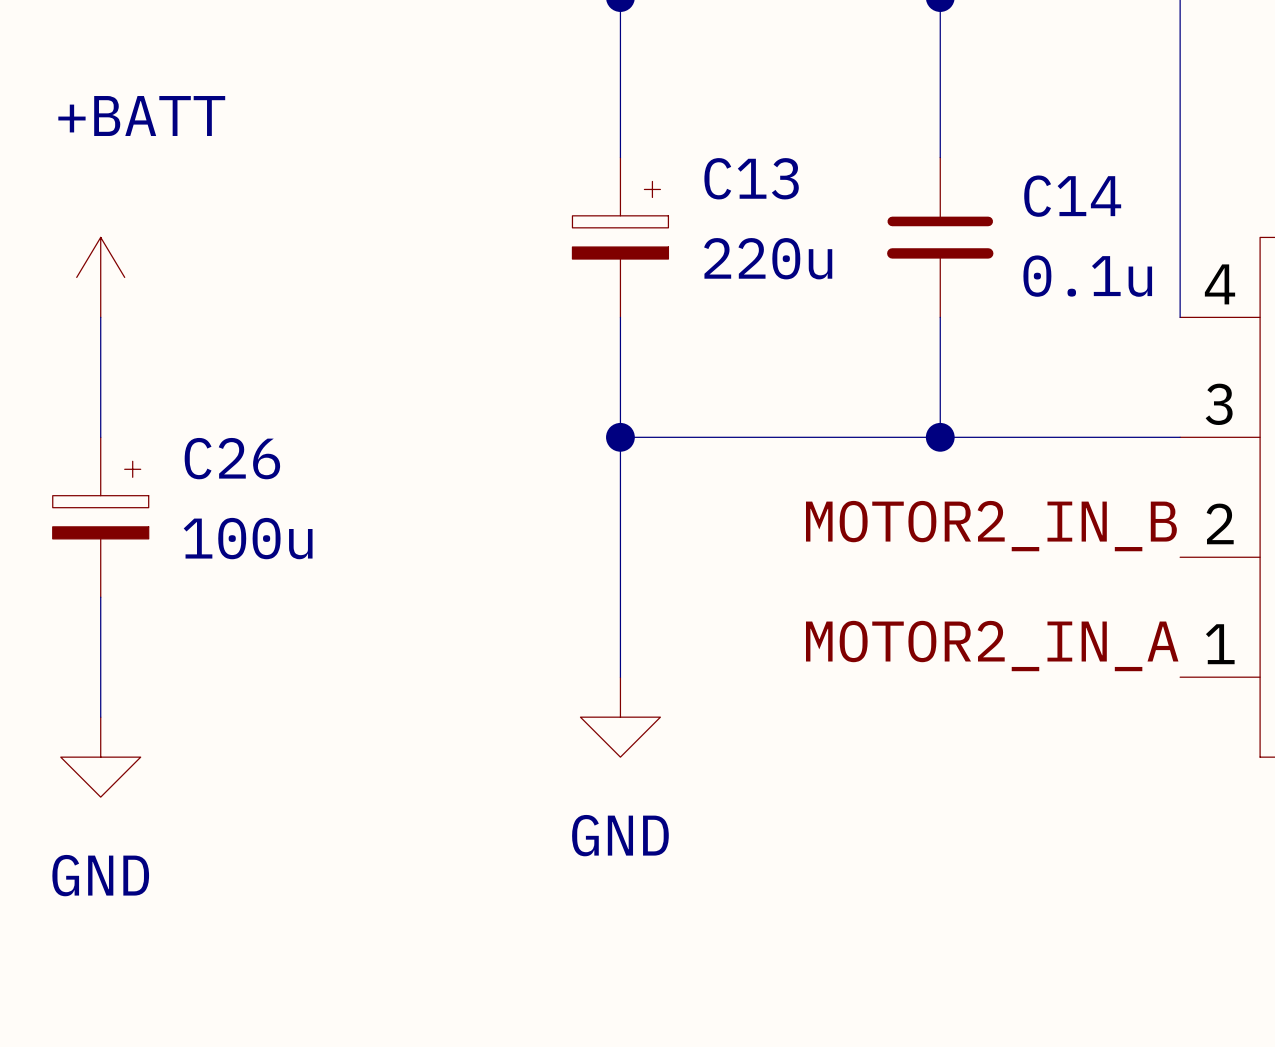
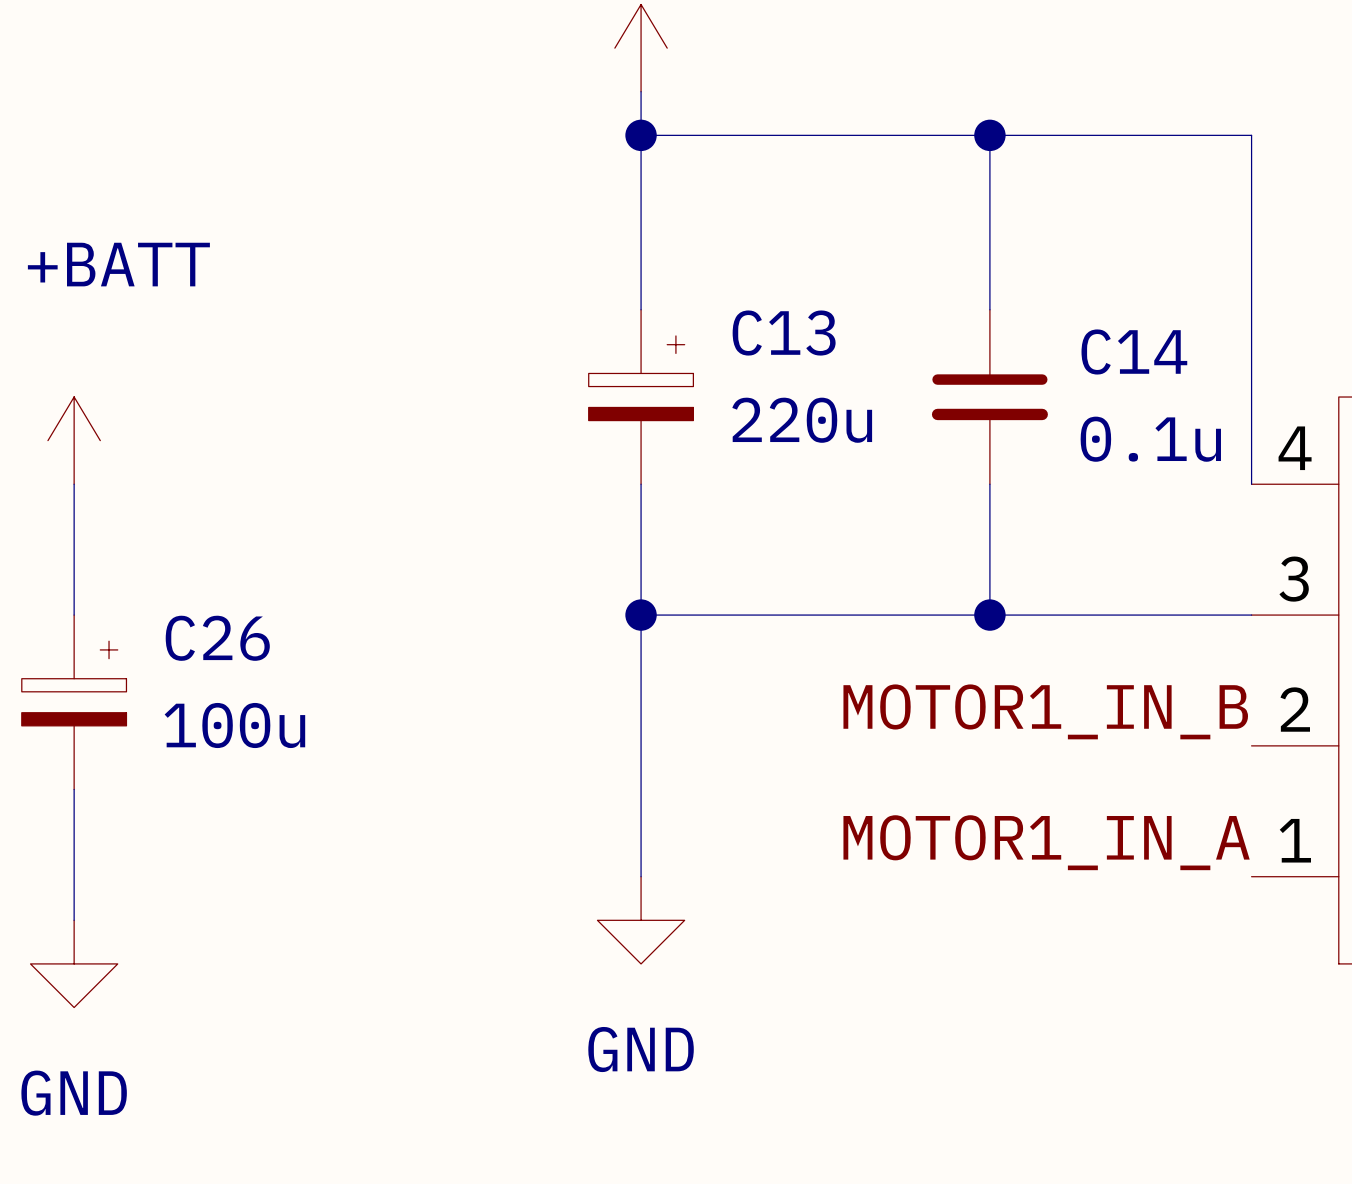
label: MOTOR2_IN_B (991, 526) -> MOTOR1_IN_B (1045, 711)
label: MOTOR2_IN_A (992, 646) -> MOTOR1_IN_A (1046, 842)

